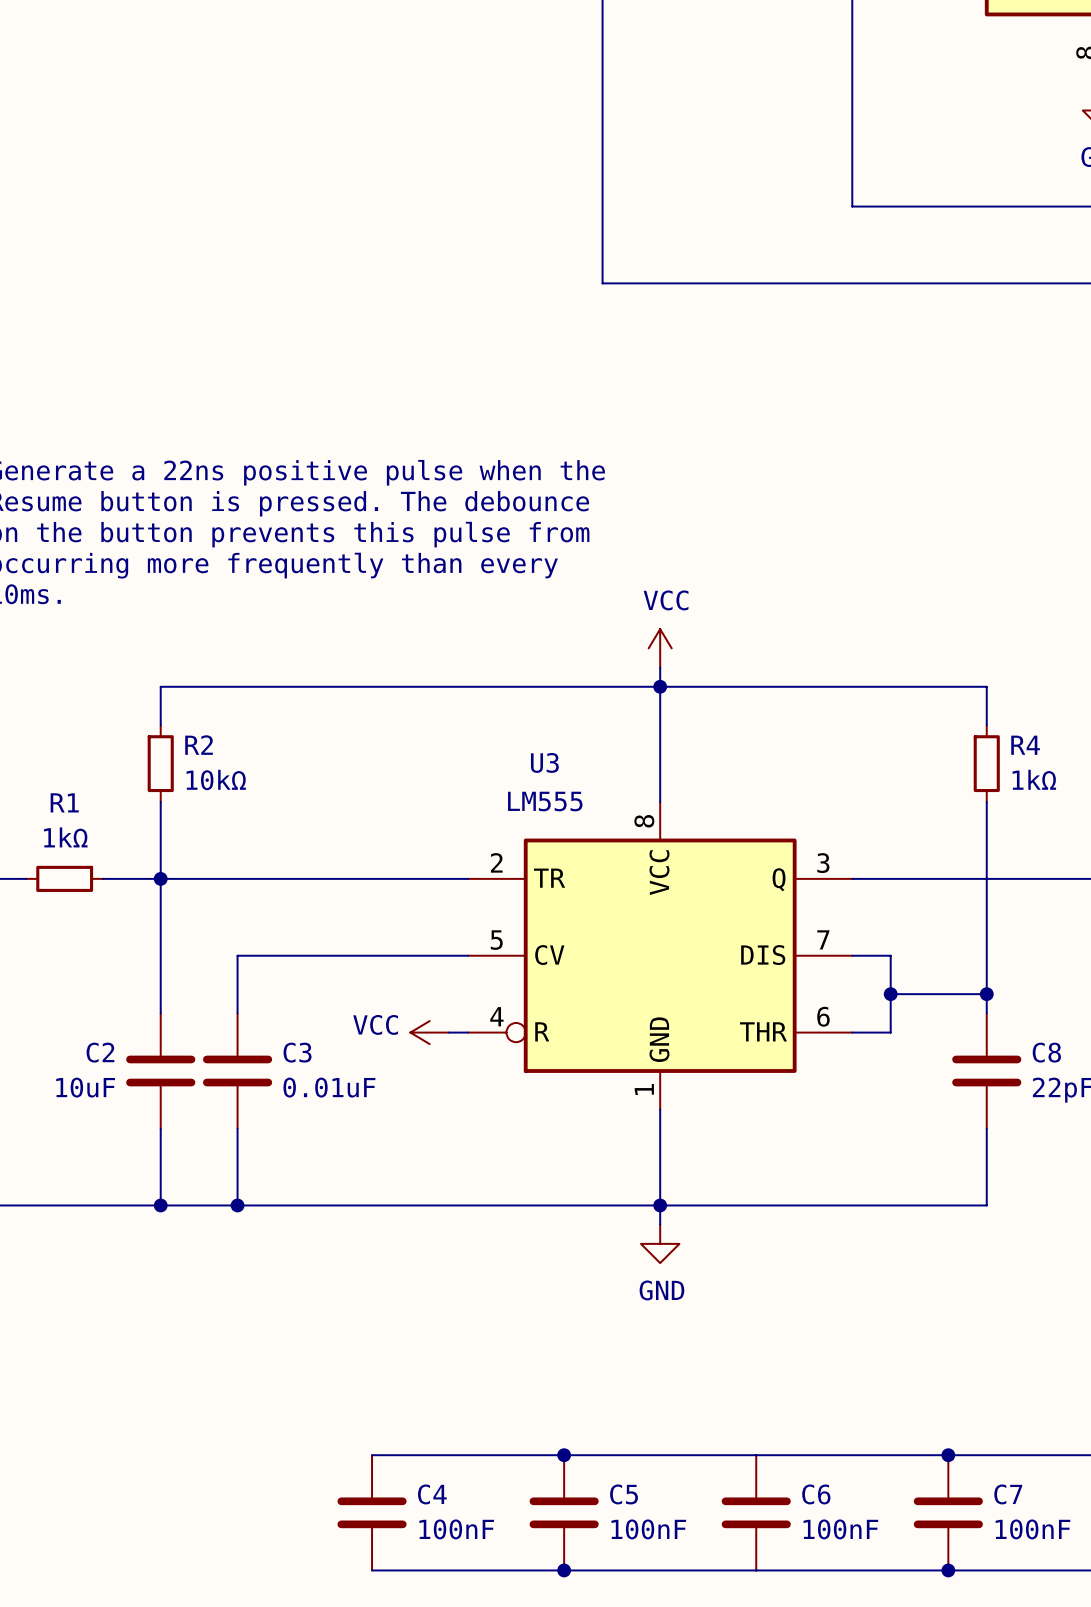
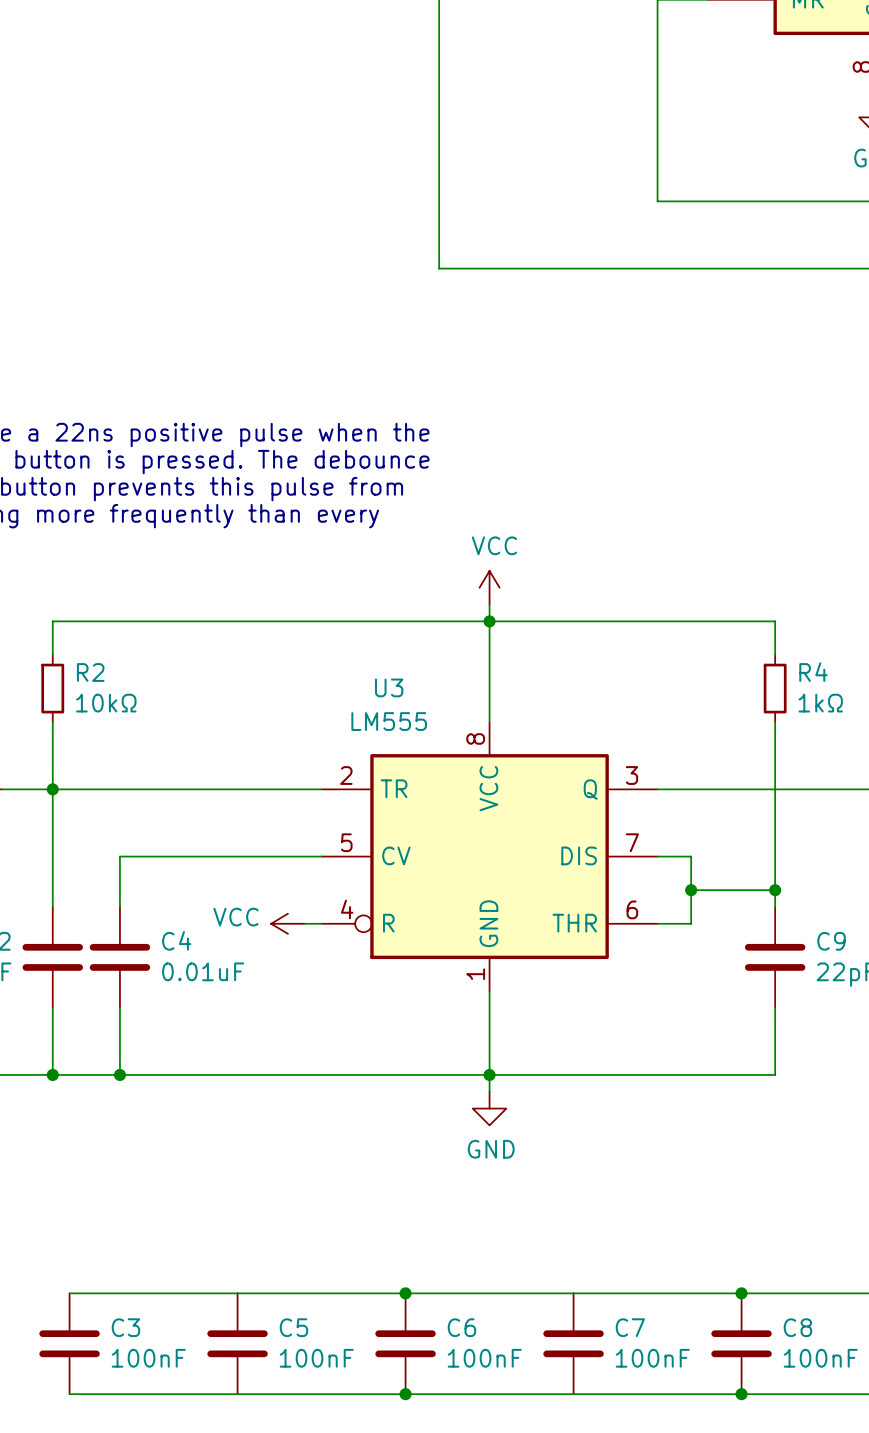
C3 name: C3 (297, 1052) -> C4 (176, 940)
C8 name: C8 (1046, 1052) -> C9 (831, 941)
wire: none -> (69, 1293) (237, 1293)
C4 name: C4 (432, 1494) -> C5 (293, 1327)
C5 name: C5 (624, 1494) -> C6 (461, 1327)
C6 name: C6 (816, 1494) -> C7 (630, 1327)
C7 name: C7 (1008, 1494) -> C8 (797, 1327)
C3: none -> 100nF (69, 1343)
wire: none -> (69, 1394) (237, 1394)

